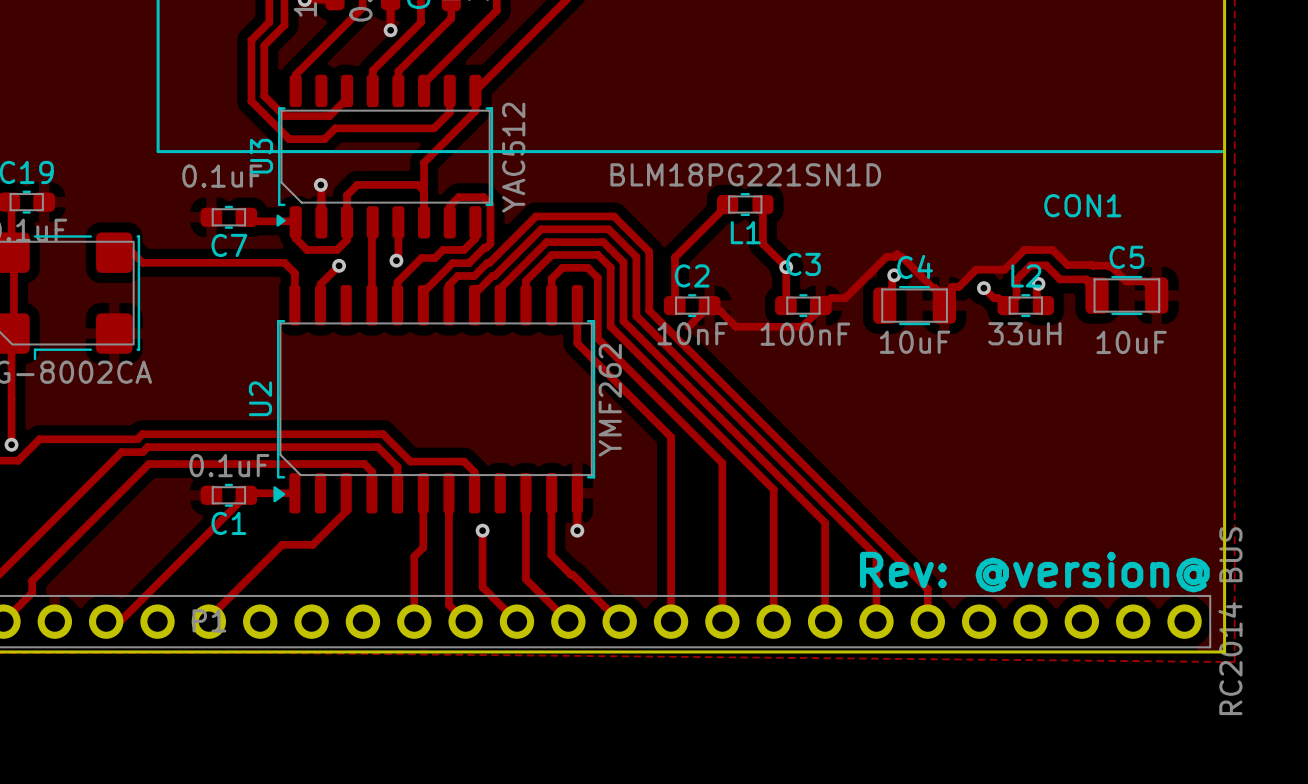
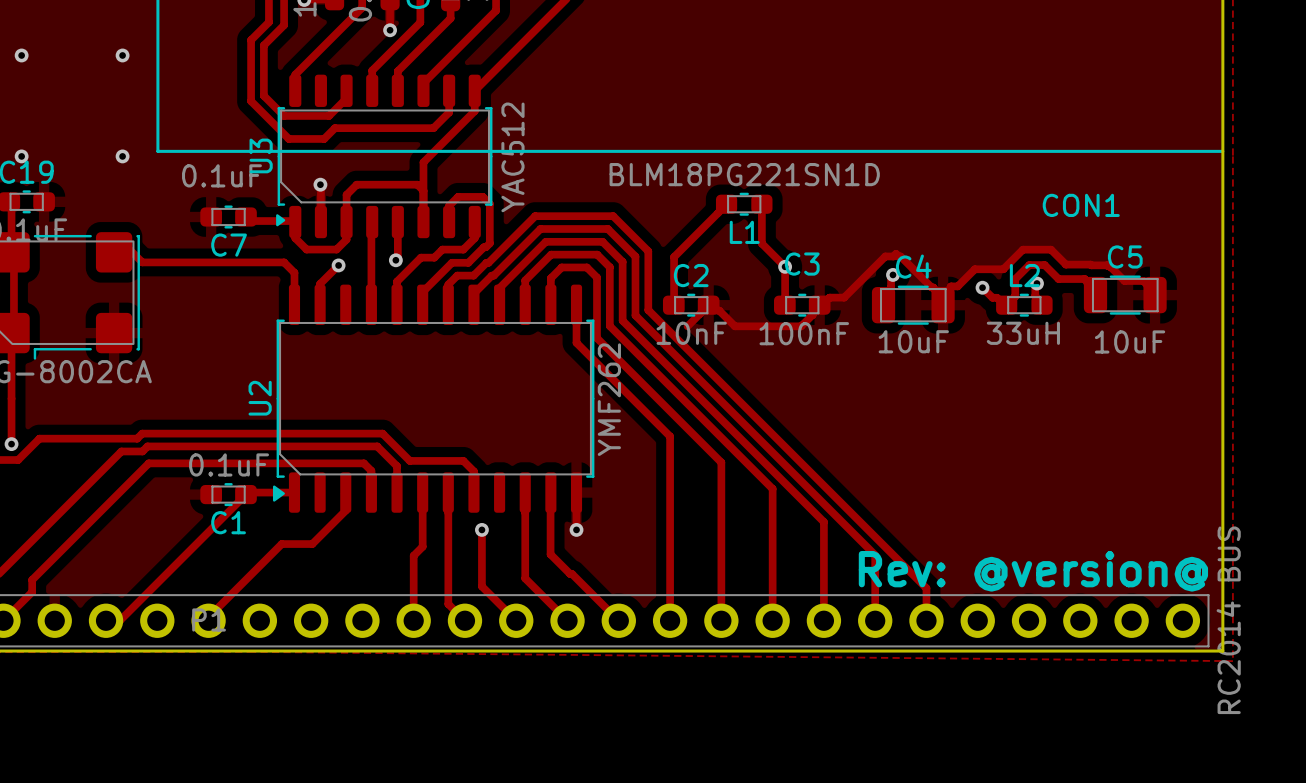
via: none -> (21, 55)
via: none -> (122, 55)
via: none -> (21, 156)
via: none -> (122, 156)

